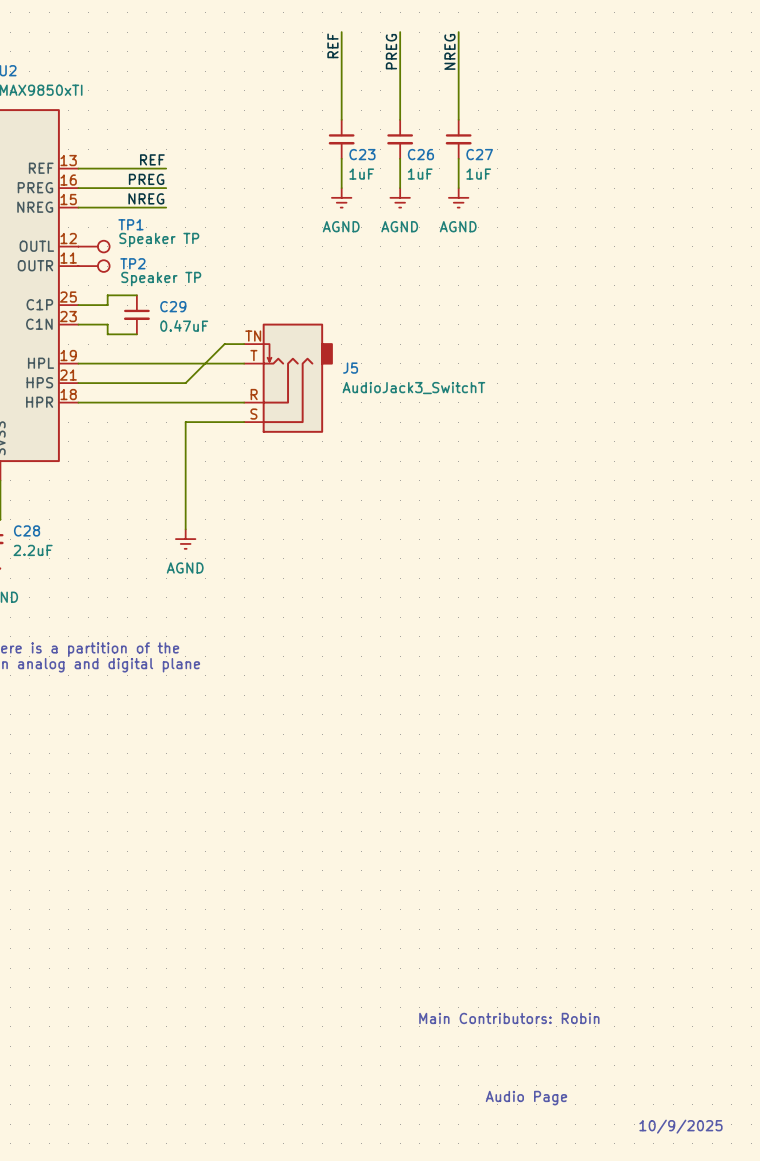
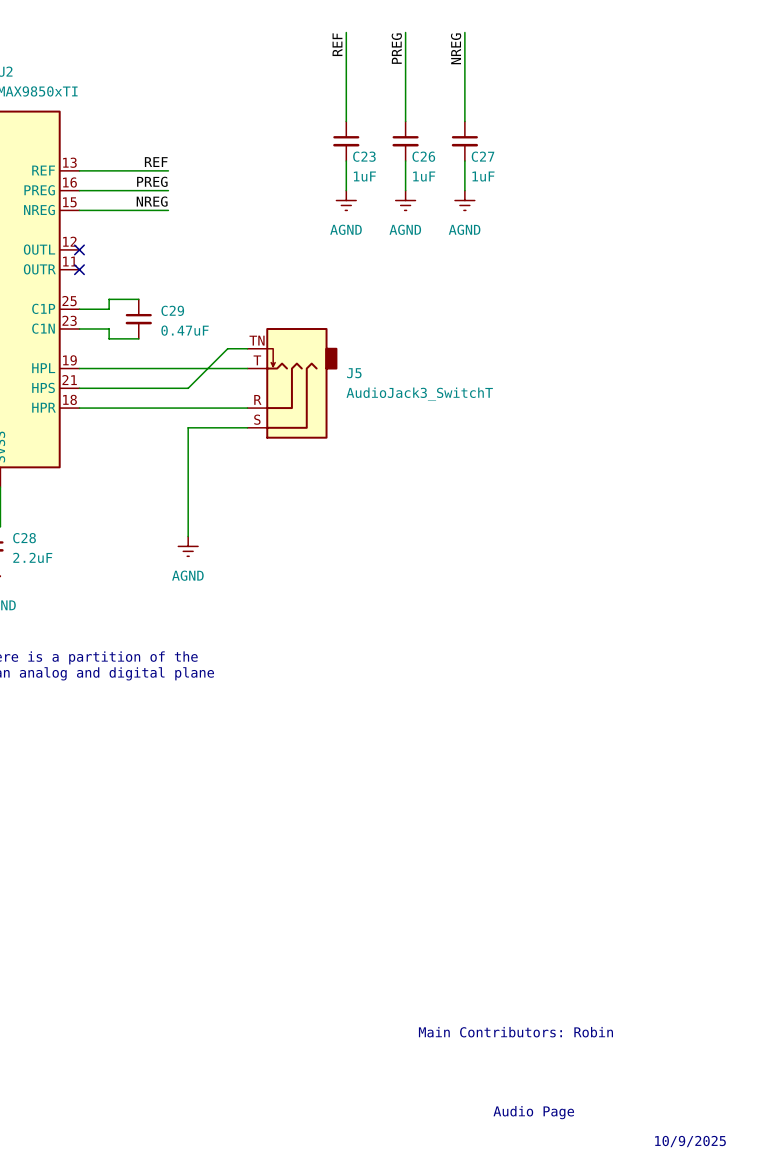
no-connect mark: none -> (79, 249)
TP1: Speaker TP (94, 246) -> none
no-connect mark: none -> (79, 269)
TP2: Speaker TP (94, 266) -> none

